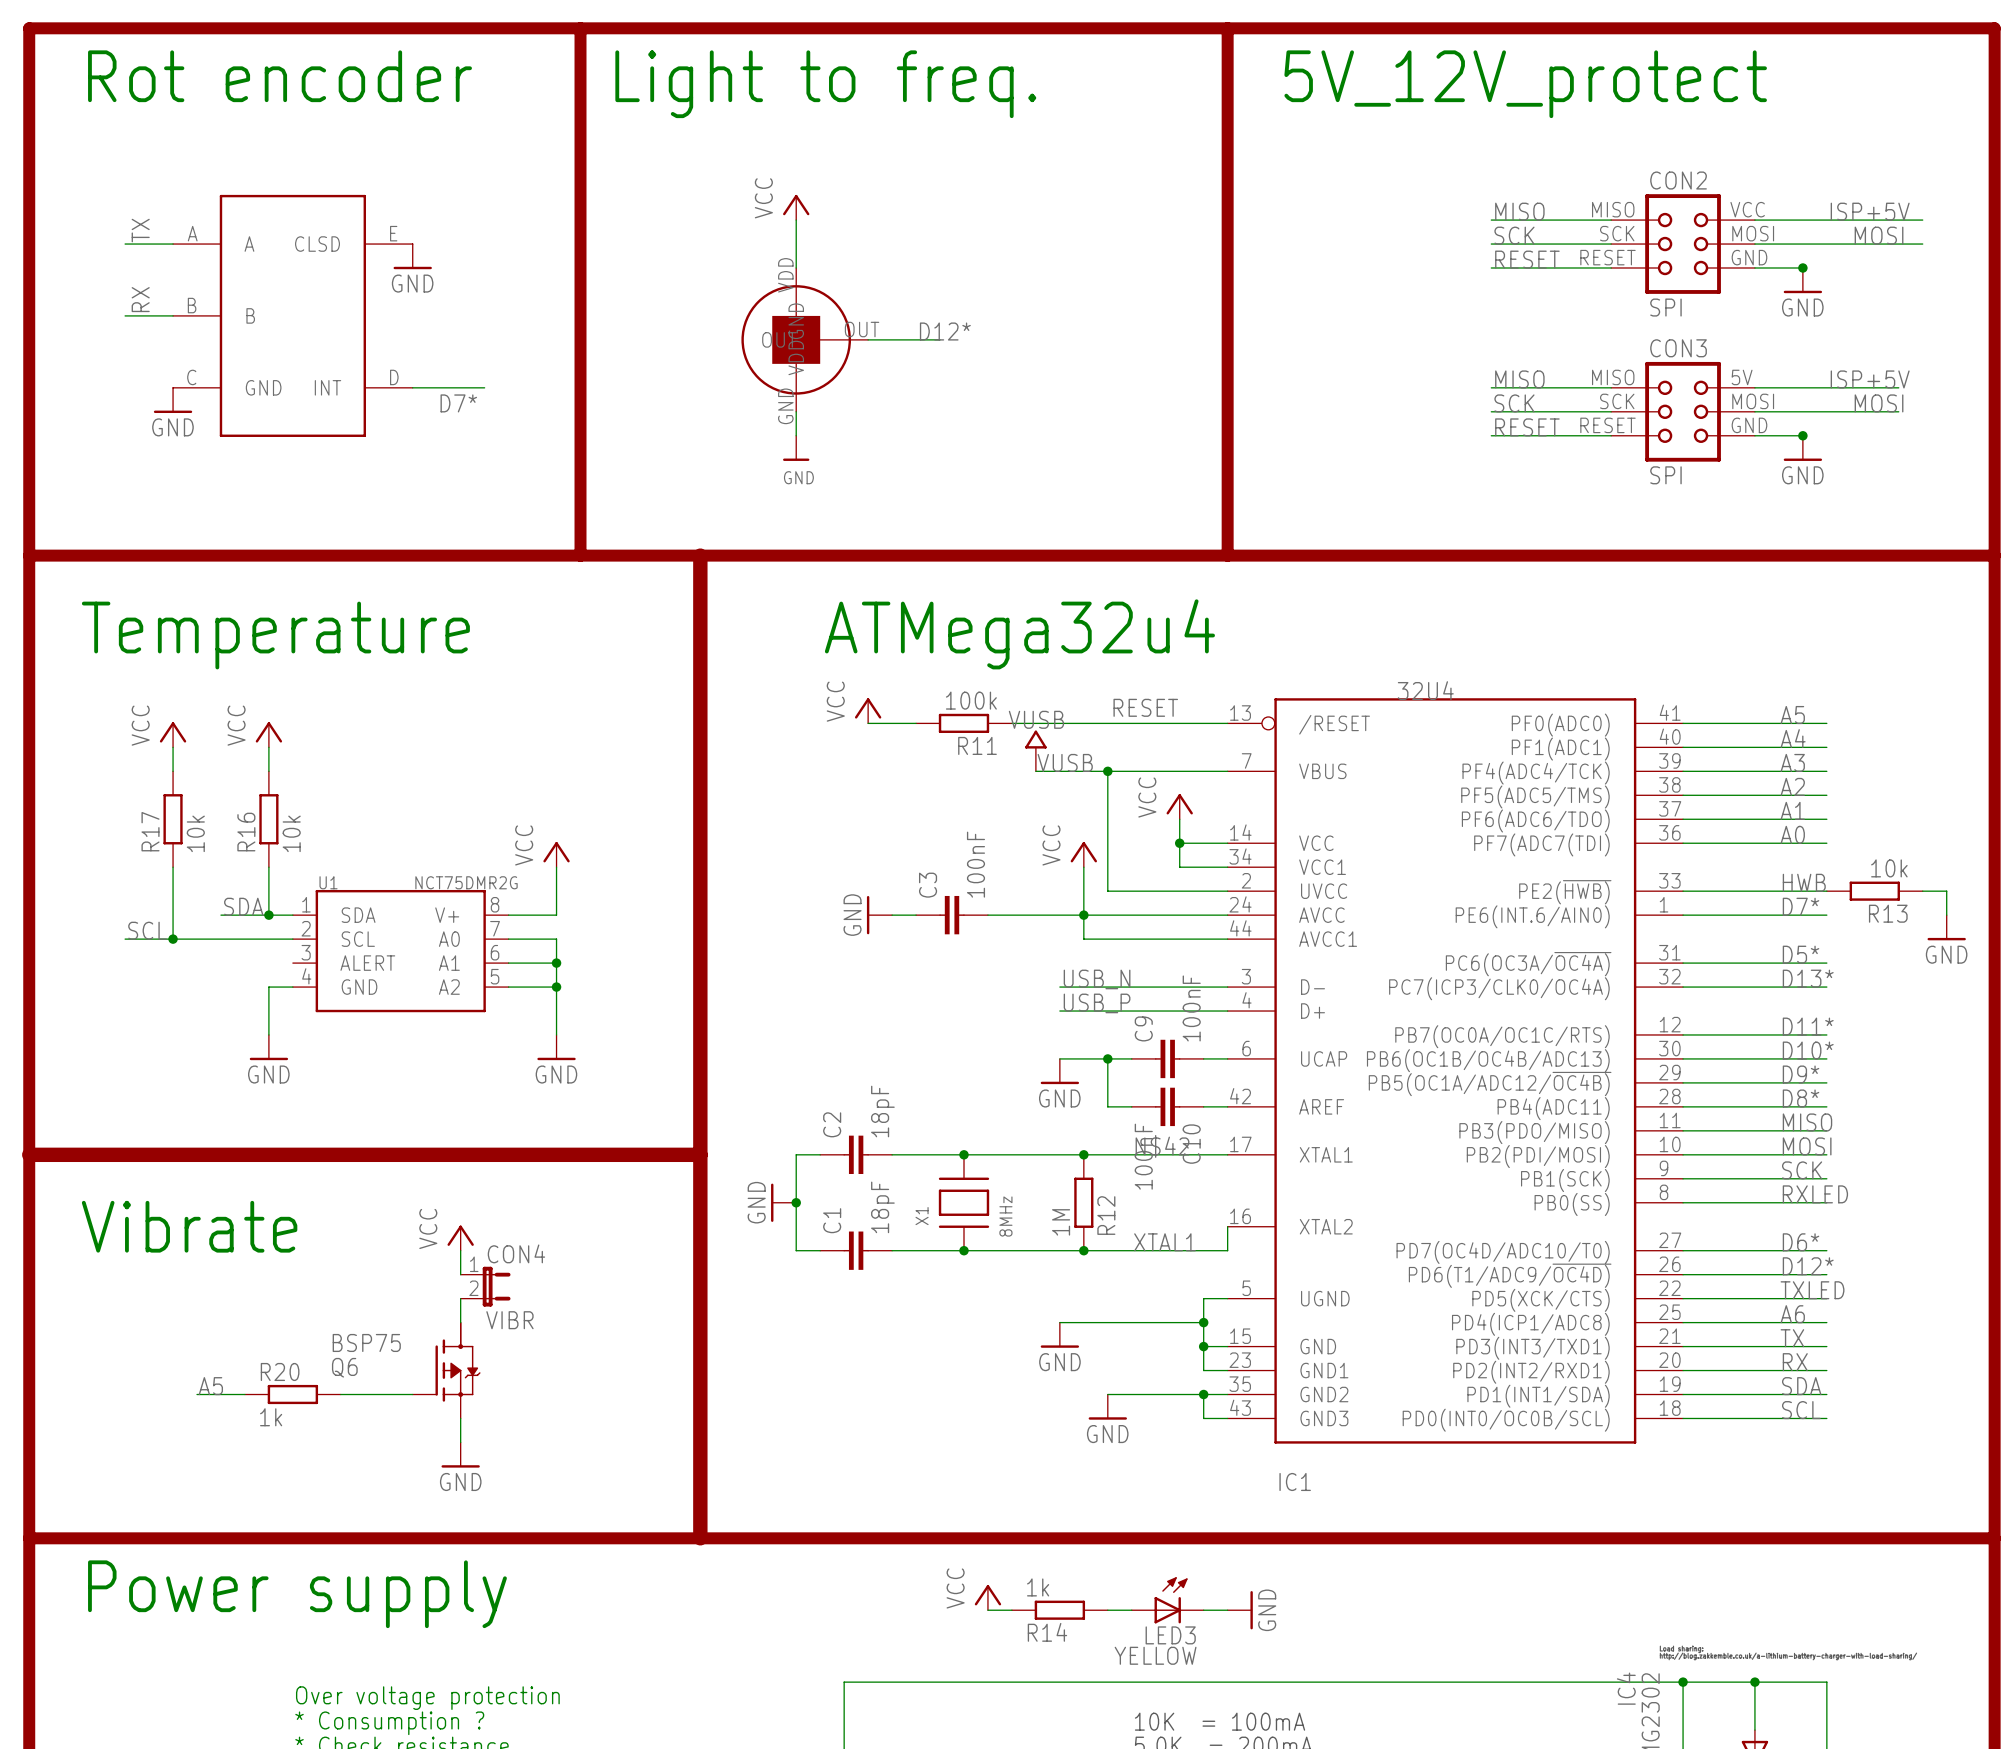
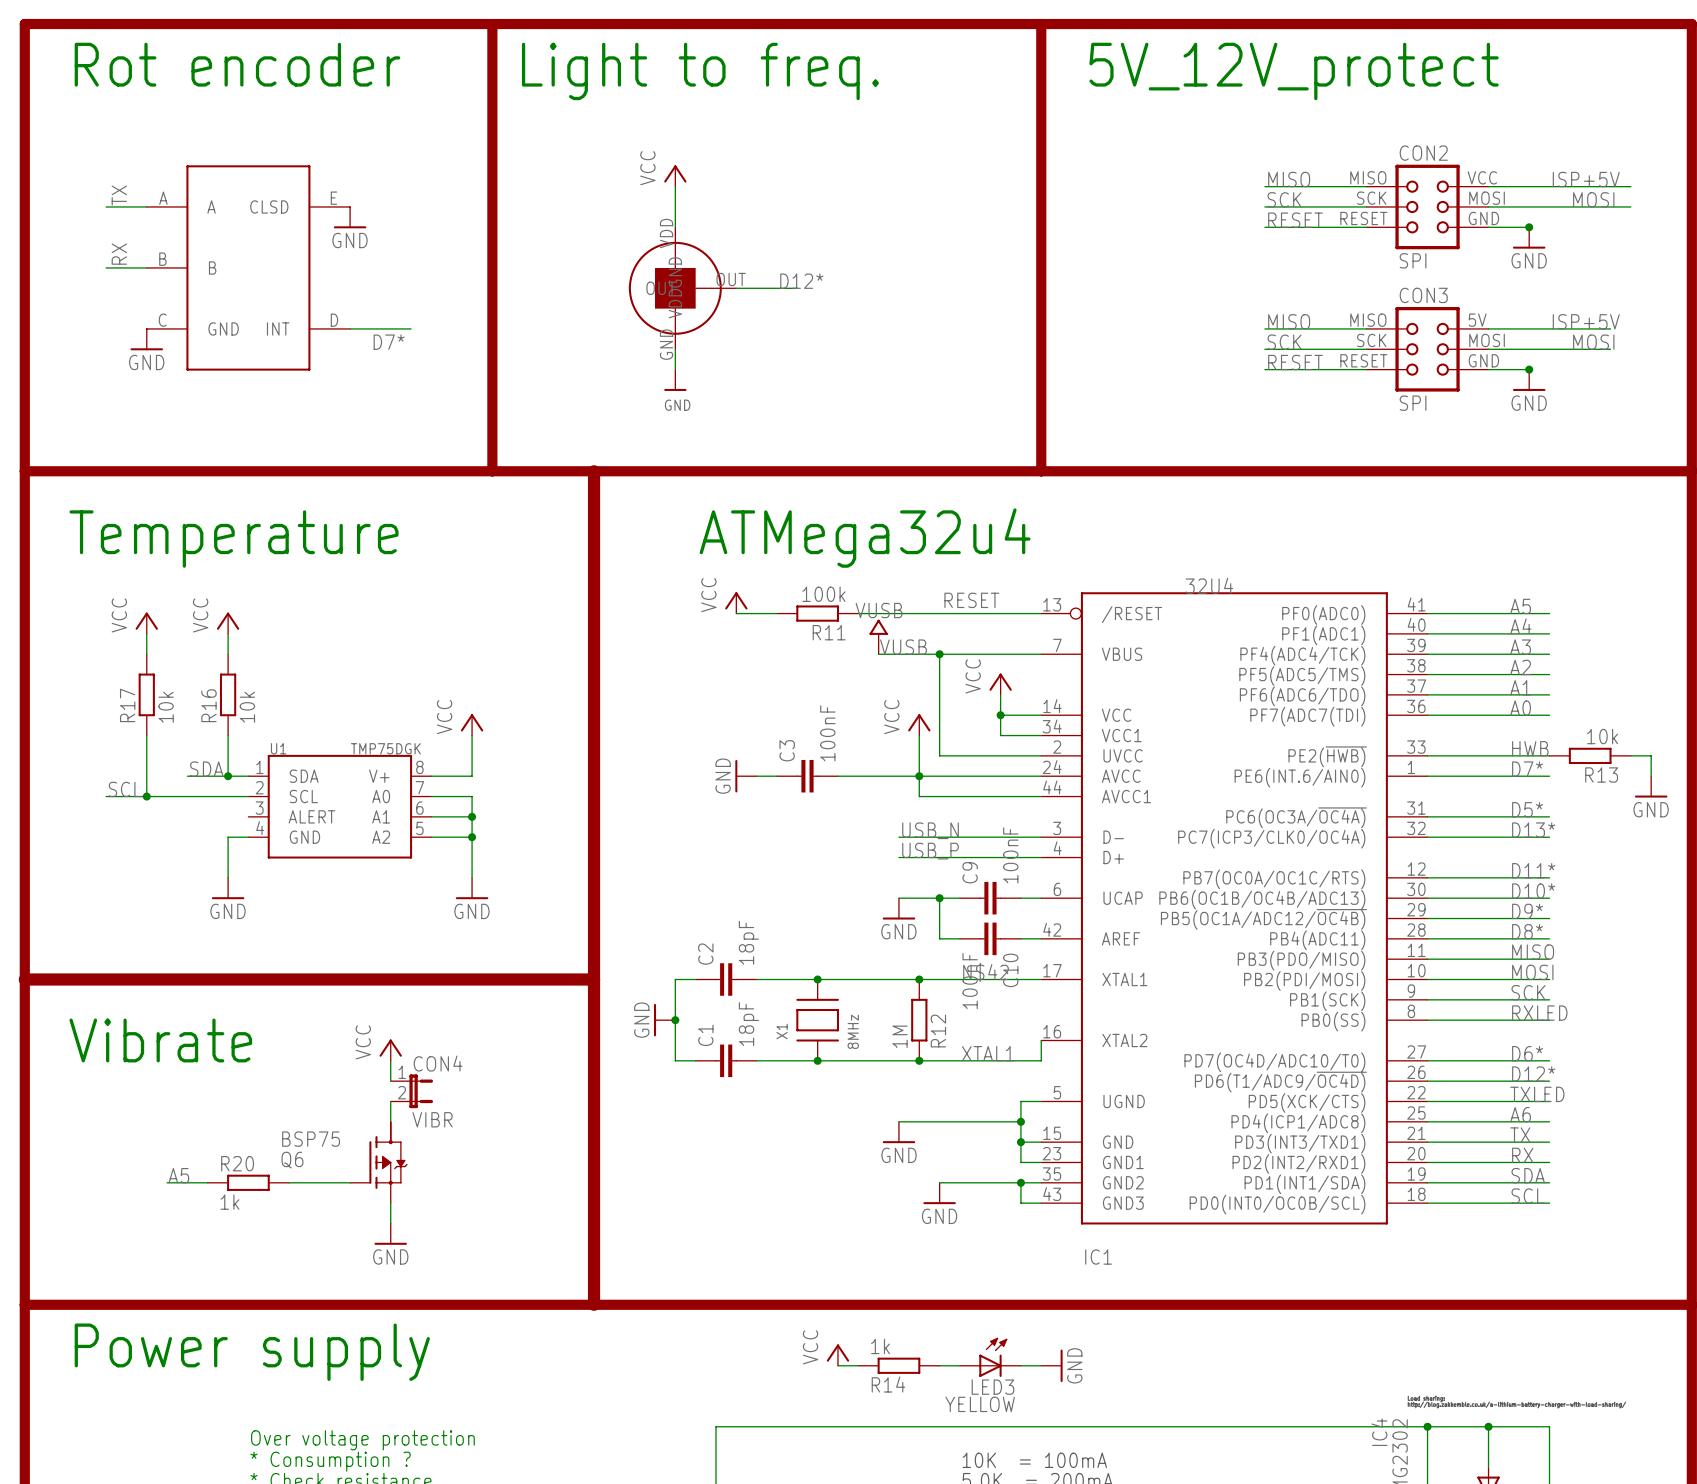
U1 value: NCT75DMR2G (466, 882) -> TMP75DGK (385, 748)

